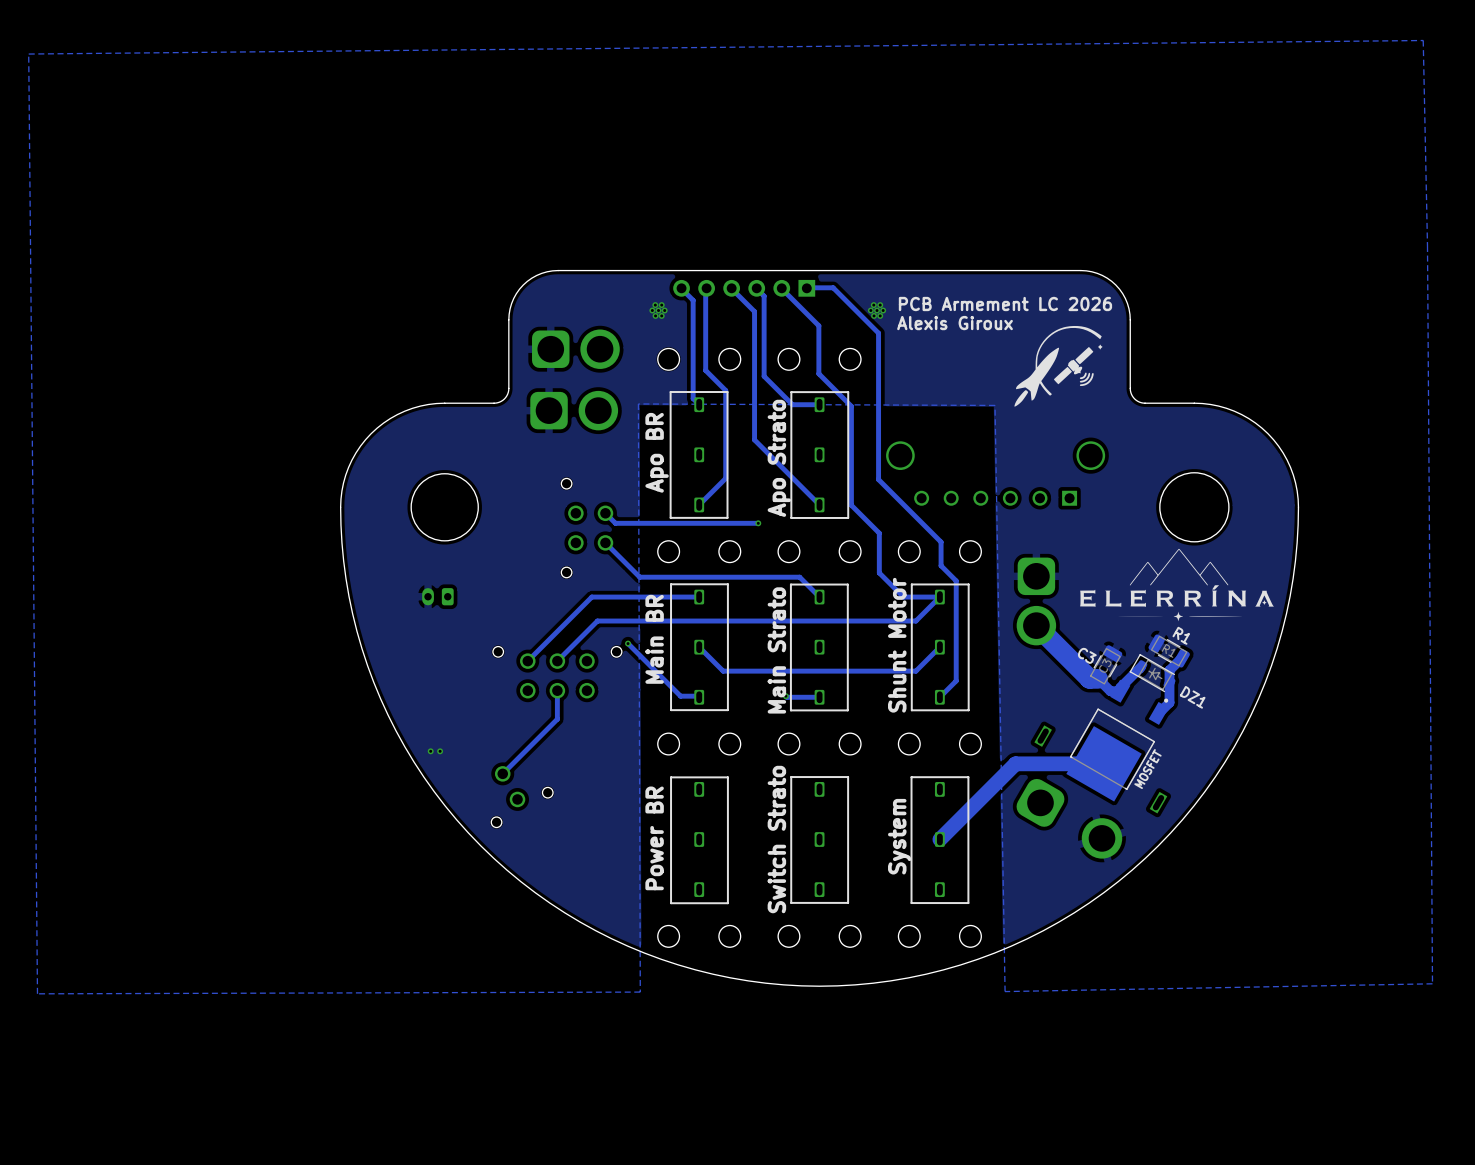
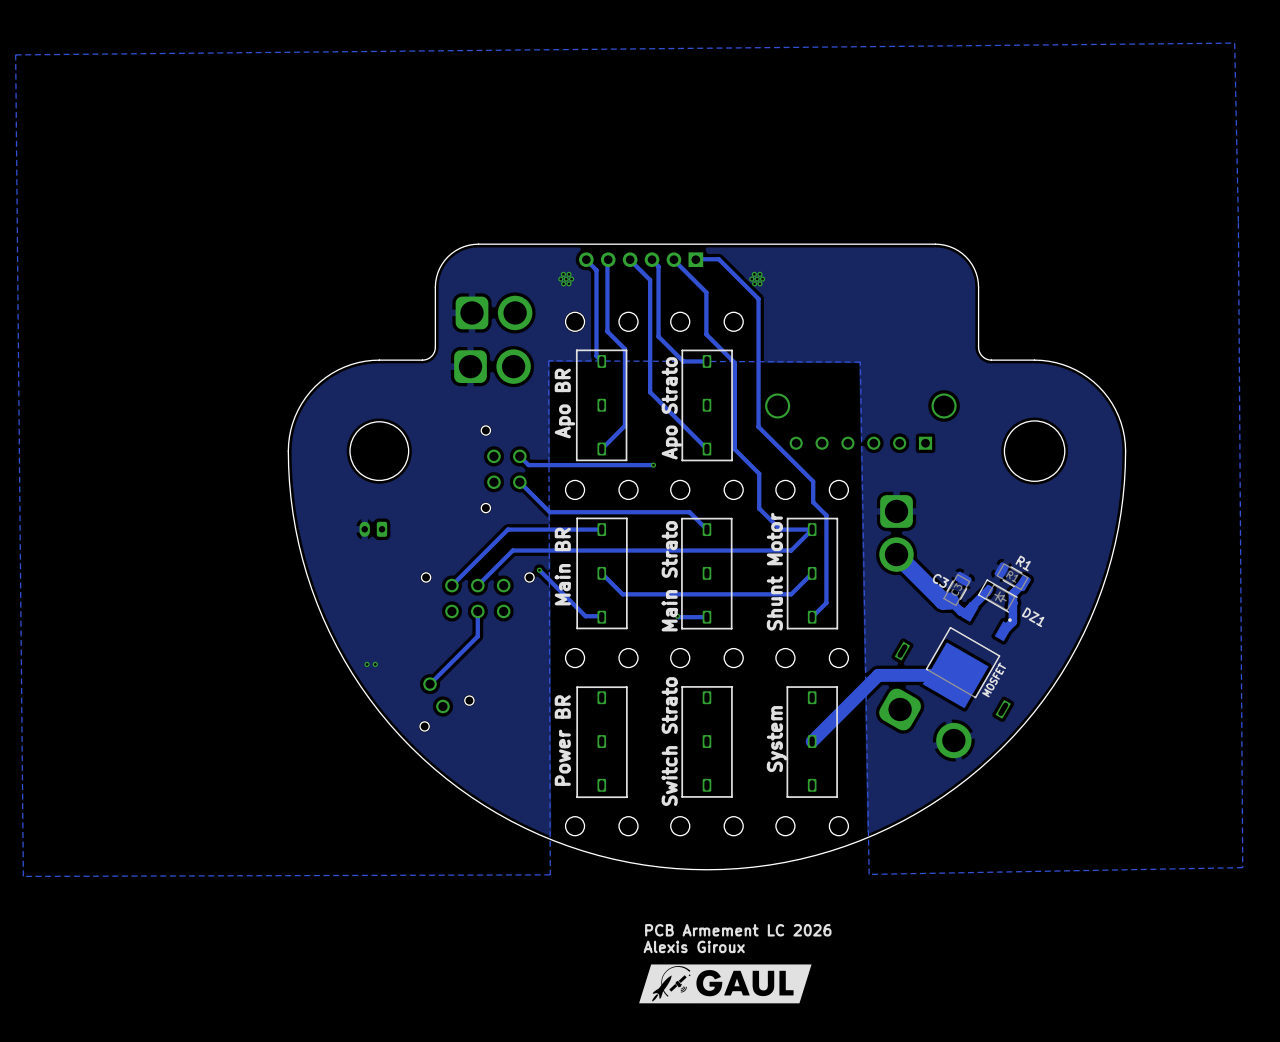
text: PCB Armement LC 2026 (1005, 303) -> none
text: Alexis Giroux (955, 323) -> none
drawing: [1014, 325, 1103, 407] -> none
drawing: [1079, 548, 1274, 622] -> none
text: none -> PCB Armement LC 2026 (738, 930)
text: none -> Alexis Giroux (694, 946)
drawing: none -> [639, 964, 812, 1004]

